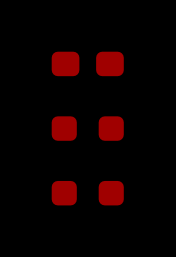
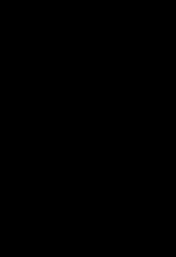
part: (87, 63) -> none
part: (87, 128) -> none
part: (87, 193) -> none

